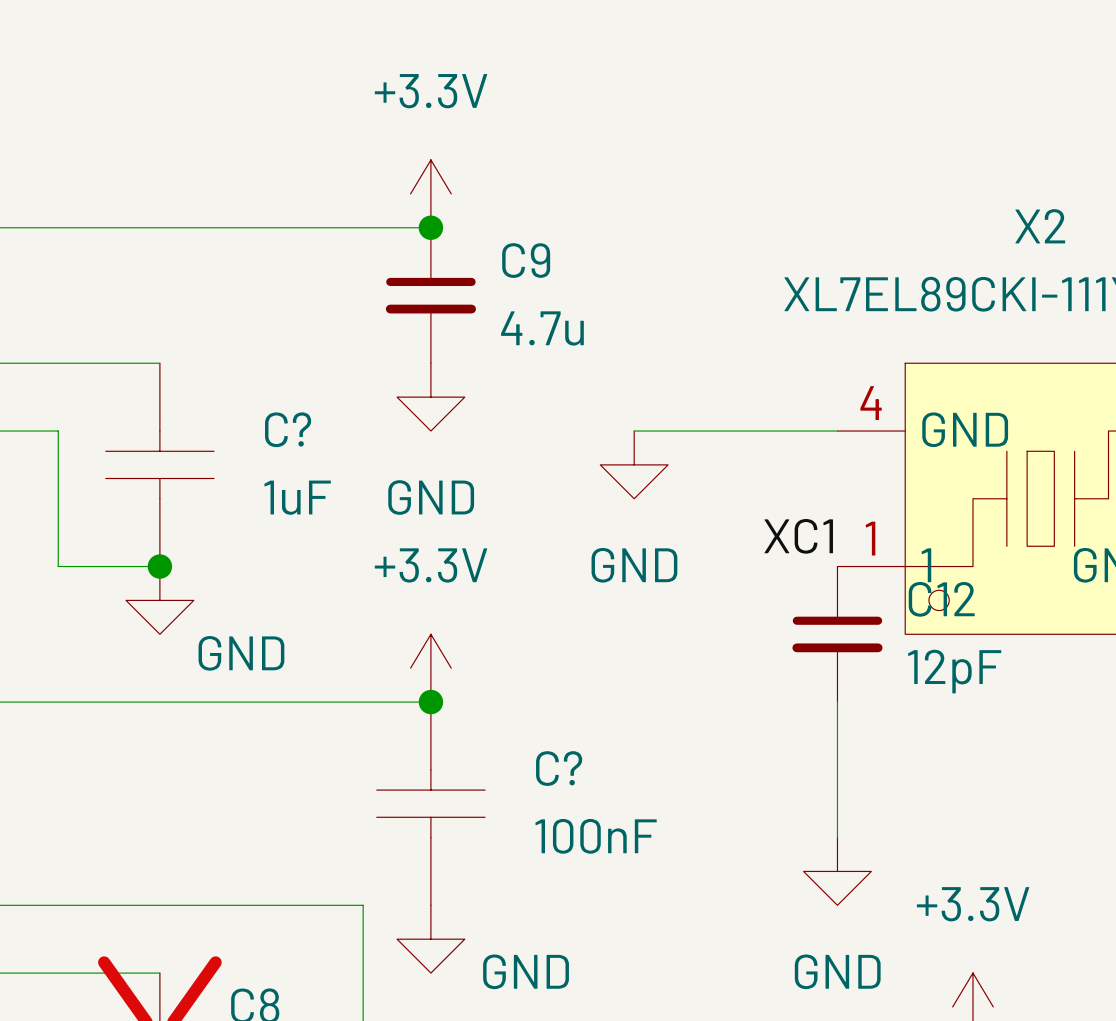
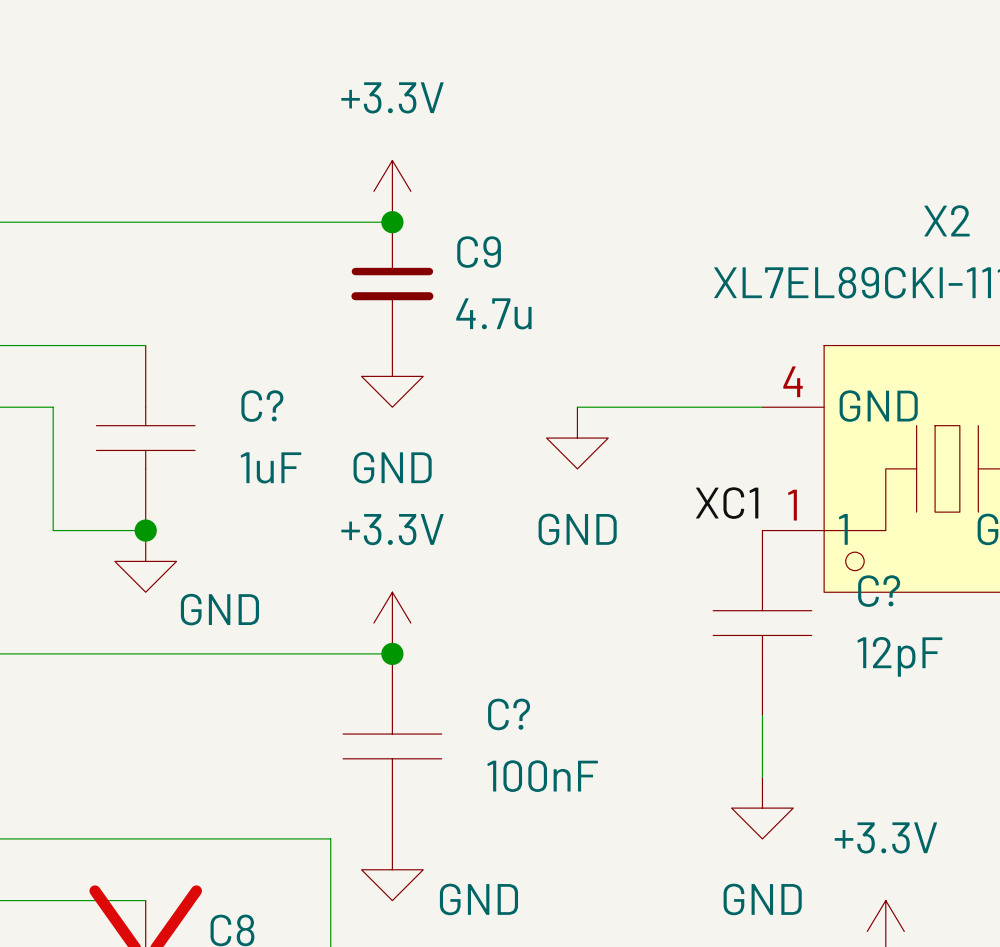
C12: 12pF (837, 634) -> none
C?: none -> (762, 623)

